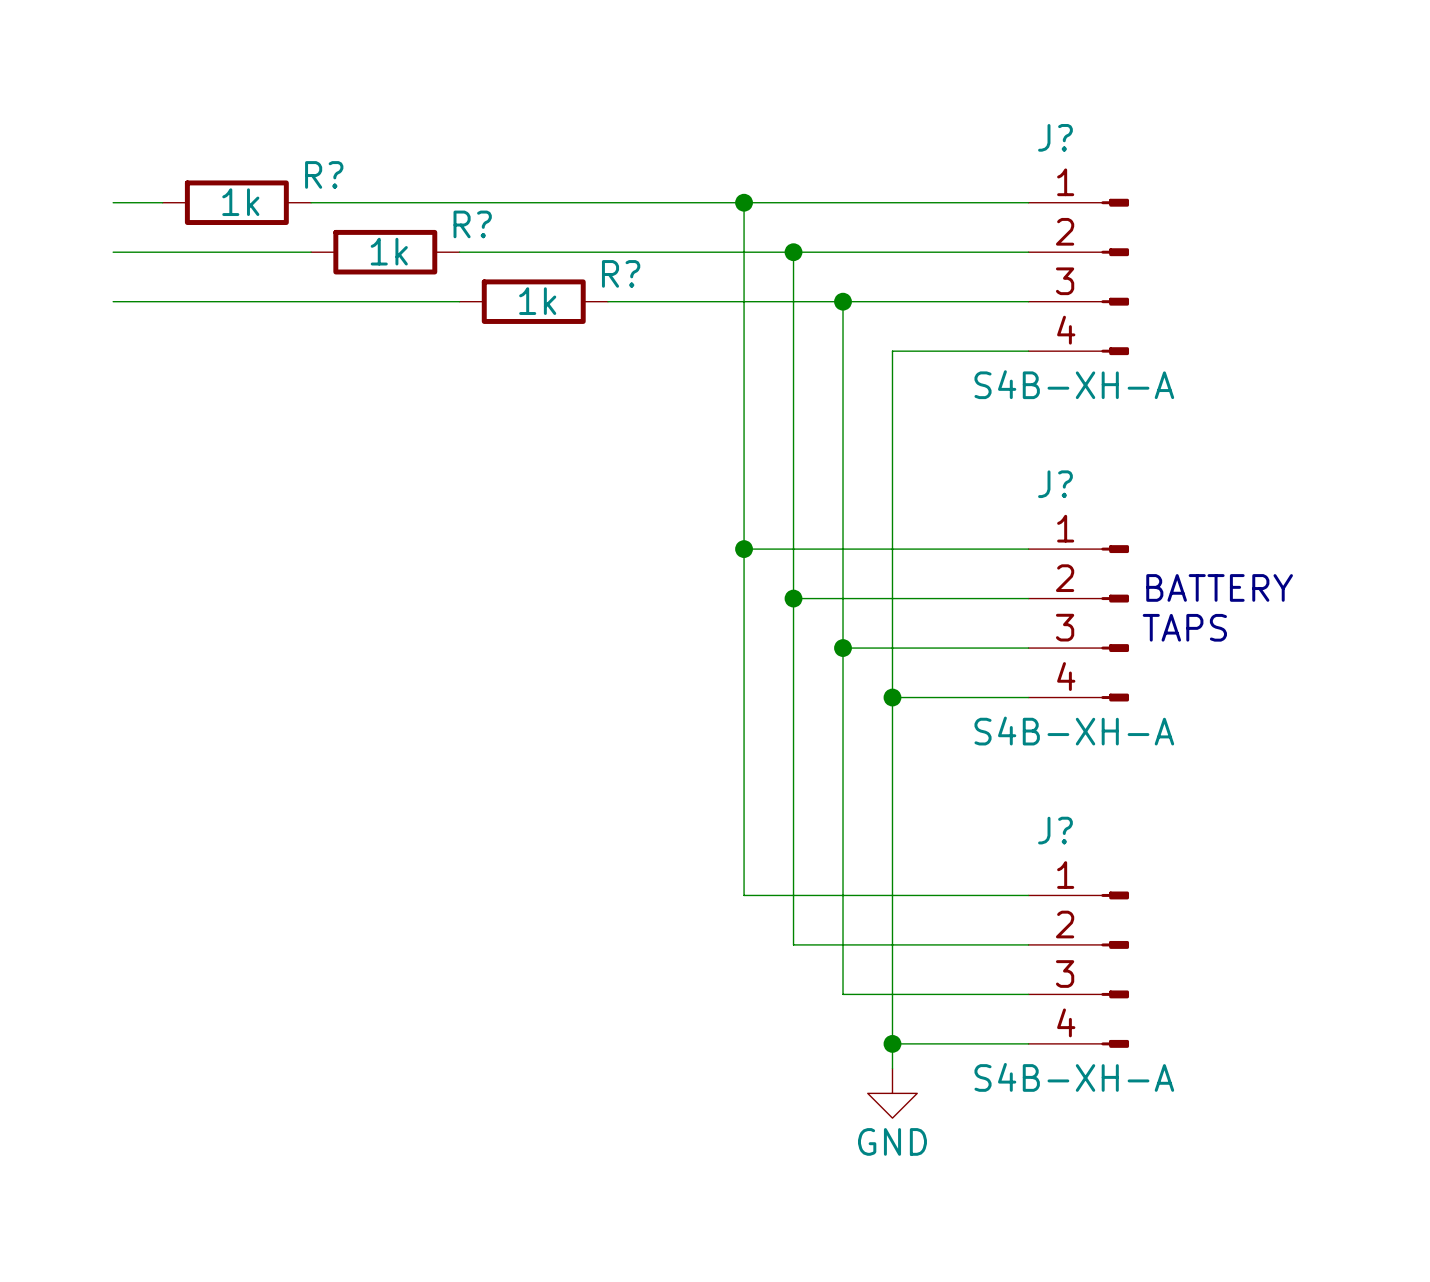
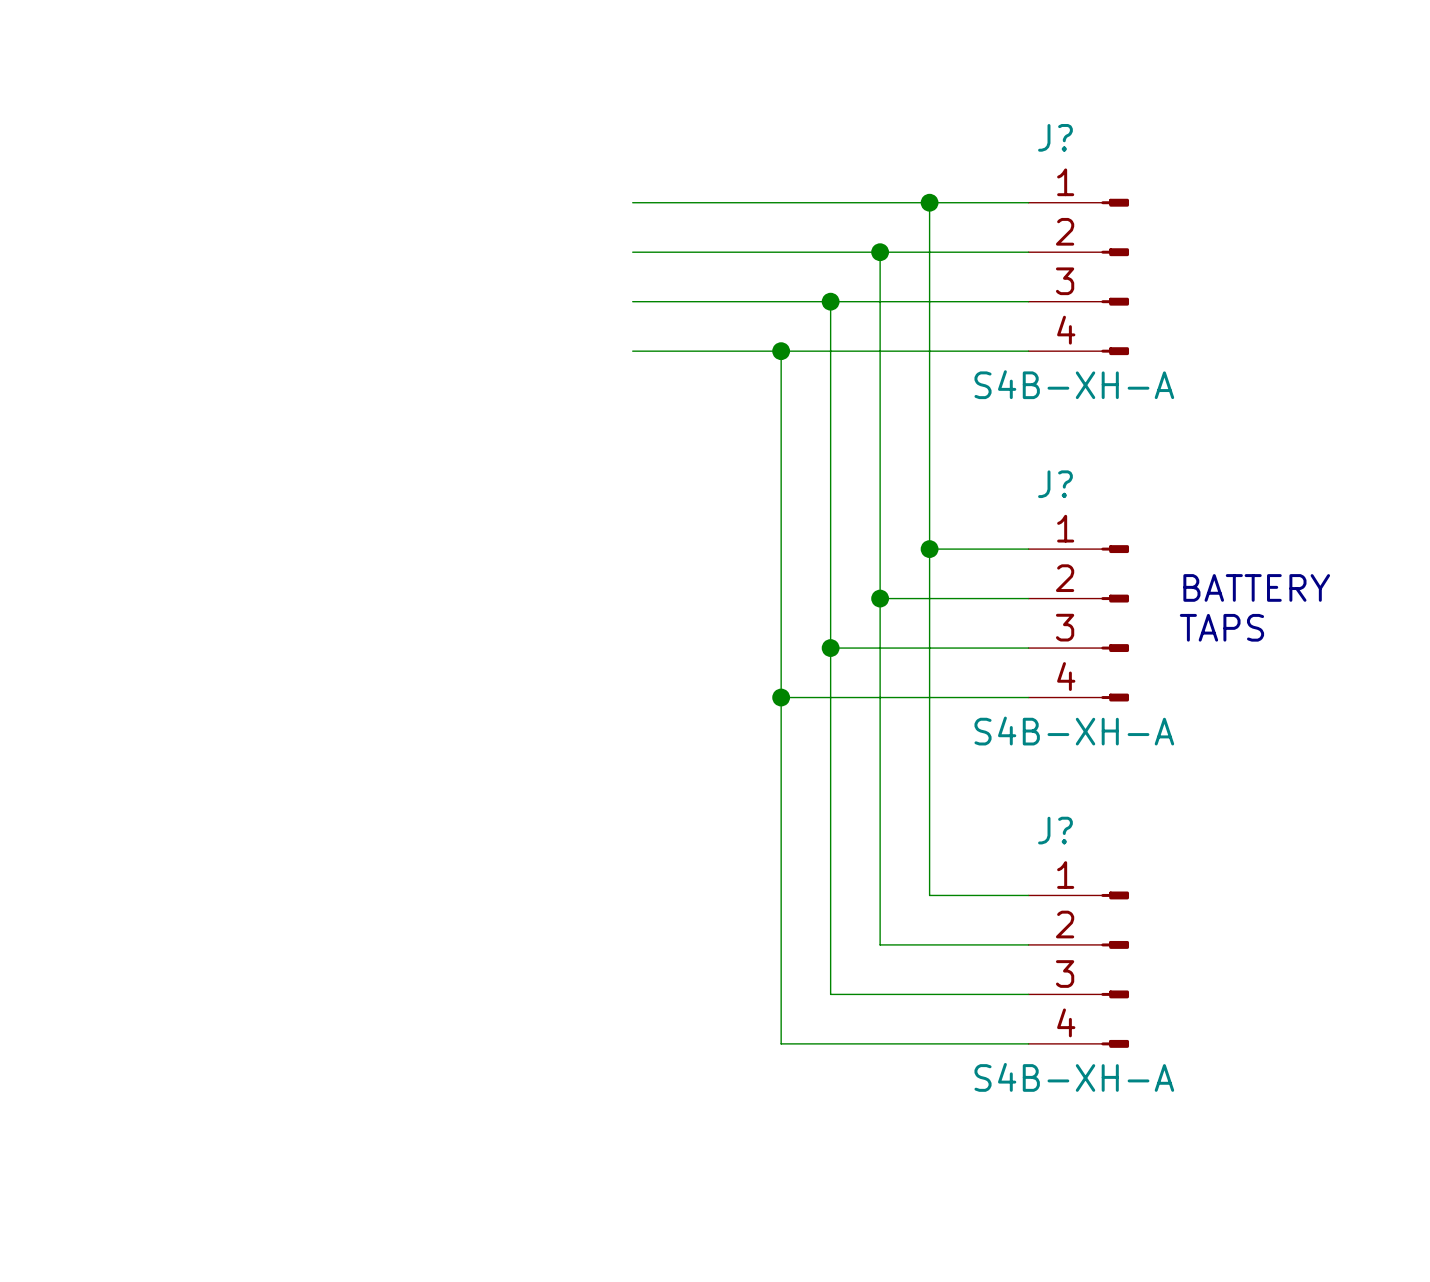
wire: (113, 202) (162, 202) -> none
R?: (236, 202) -> none
wire: (311, 202) (632, 202) -> none
wire: (744, 202) (744, 895) (929, 895) -> (929, 202) (929, 895)
junction: (744, 202) -> none
junction: none -> (929, 202)
wire: (113, 252) (311, 252) -> none
R?: (385, 252) -> none
wire: (459, 252) (632, 252) -> none
wire: (793, 252) (793, 944) (880, 944) -> (880, 252) (880, 944)
junction: (793, 252) -> none
junction: none -> (880, 252)
wire: (113, 301) (459, 301) -> none
R?: (533, 301) -> none
wire: (607, 301) (632, 301) -> none
wire: (843, 301) (843, 994) -> (830, 301) (830, 994) (843, 994)
junction position: (843, 301) -> (830, 301)
wire: none -> (781, 351) (781, 1043) (892, 1043)
junction: none -> (781, 351)
wire: (892, 351) (892, 1068) -> (892, 351) (632, 351)
wire: (744, 549) (929, 549) -> none
junction: (744, 549) -> none
junction: none -> (929, 549)
text position: BATTERY (1219, 587) -> BATTERY (1256, 587)
wire: (793, 598) (880, 598) -> none
junction: (793, 598) -> none
junction: none -> (880, 598)
text position: TAPS (1184, 627) -> TAPS (1221, 627)
junction position: (843, 648) -> (830, 648)
wire: none -> (781, 697) (892, 697)
junction: none -> (781, 697)
junction: (892, 697) -> none
junction: (892, 1043) -> none
power symbol: GND (892, 1093) -> none

